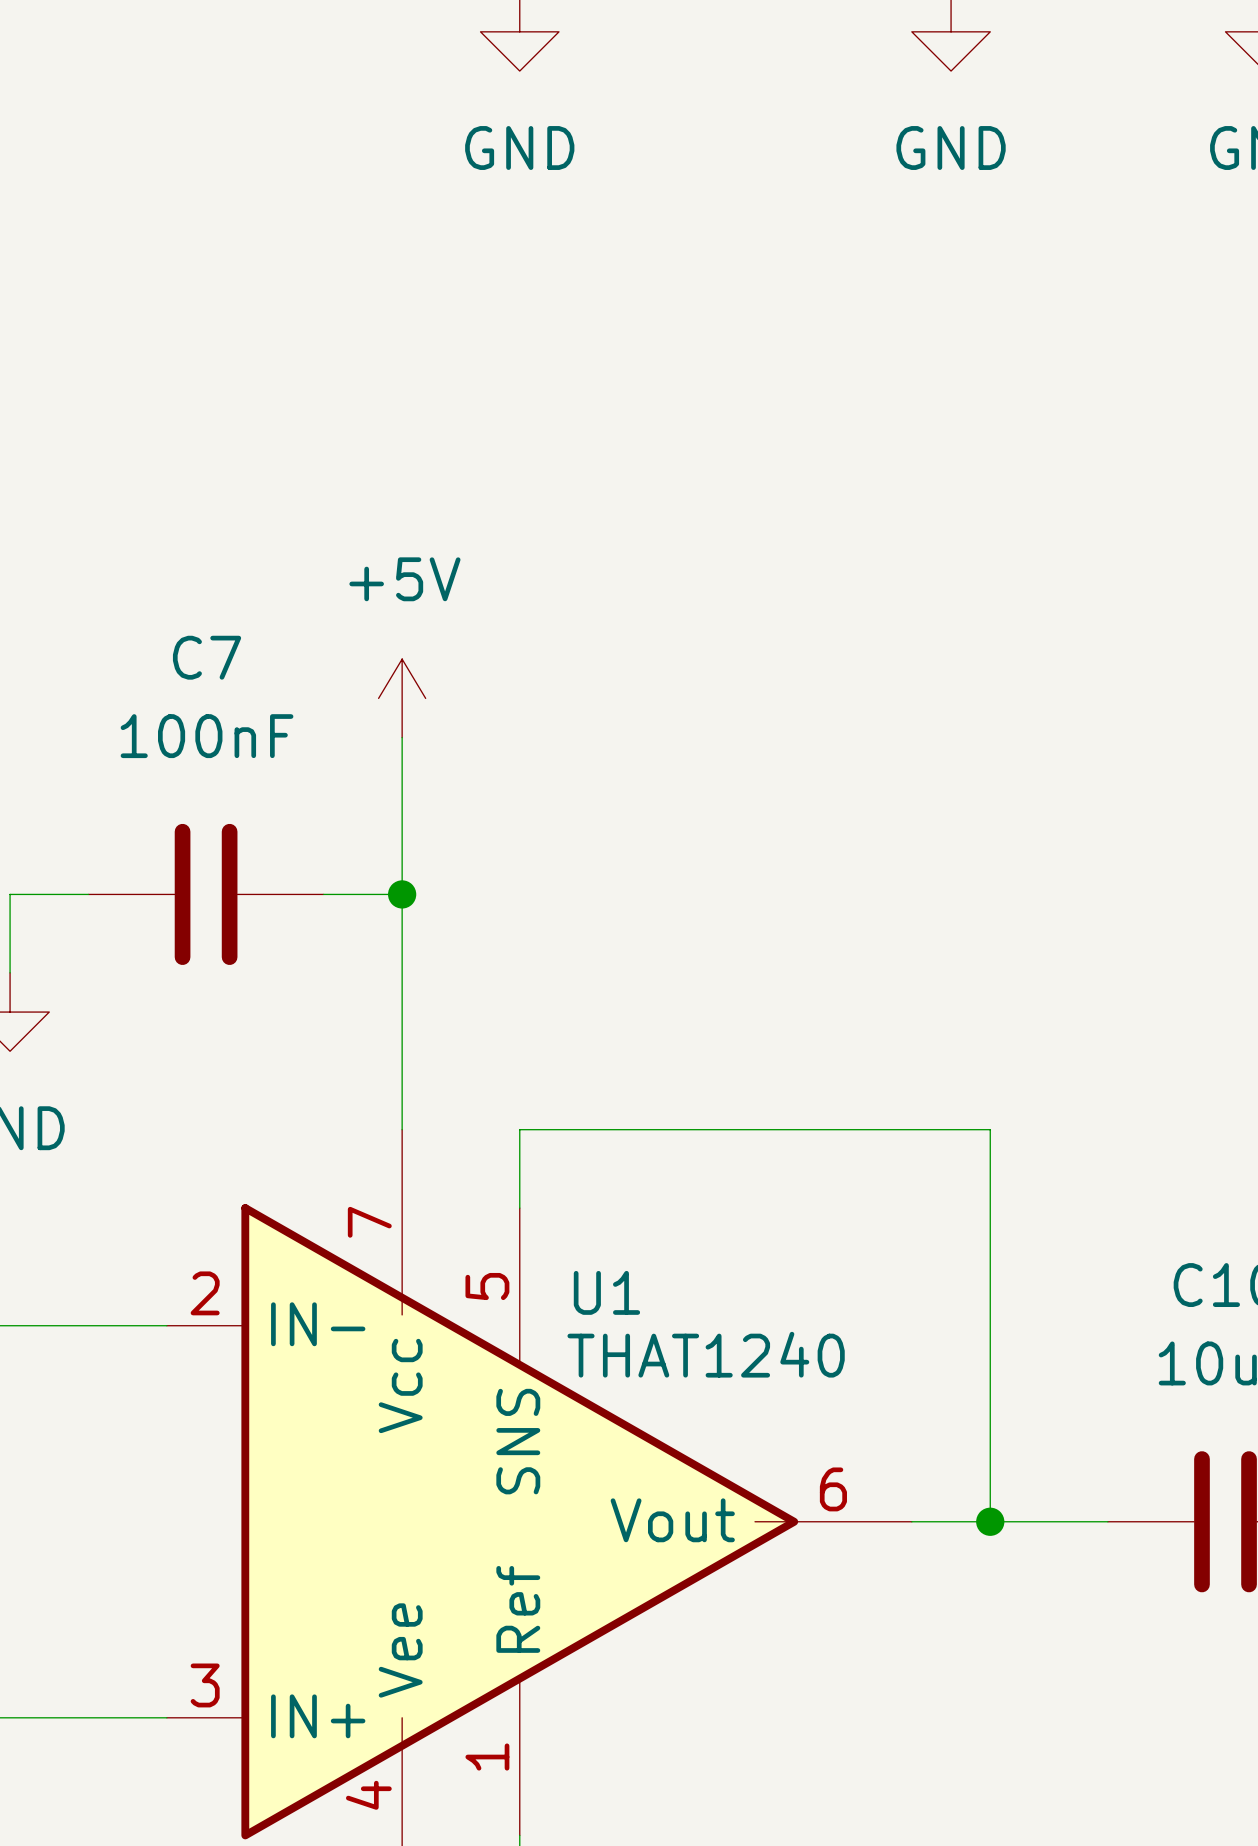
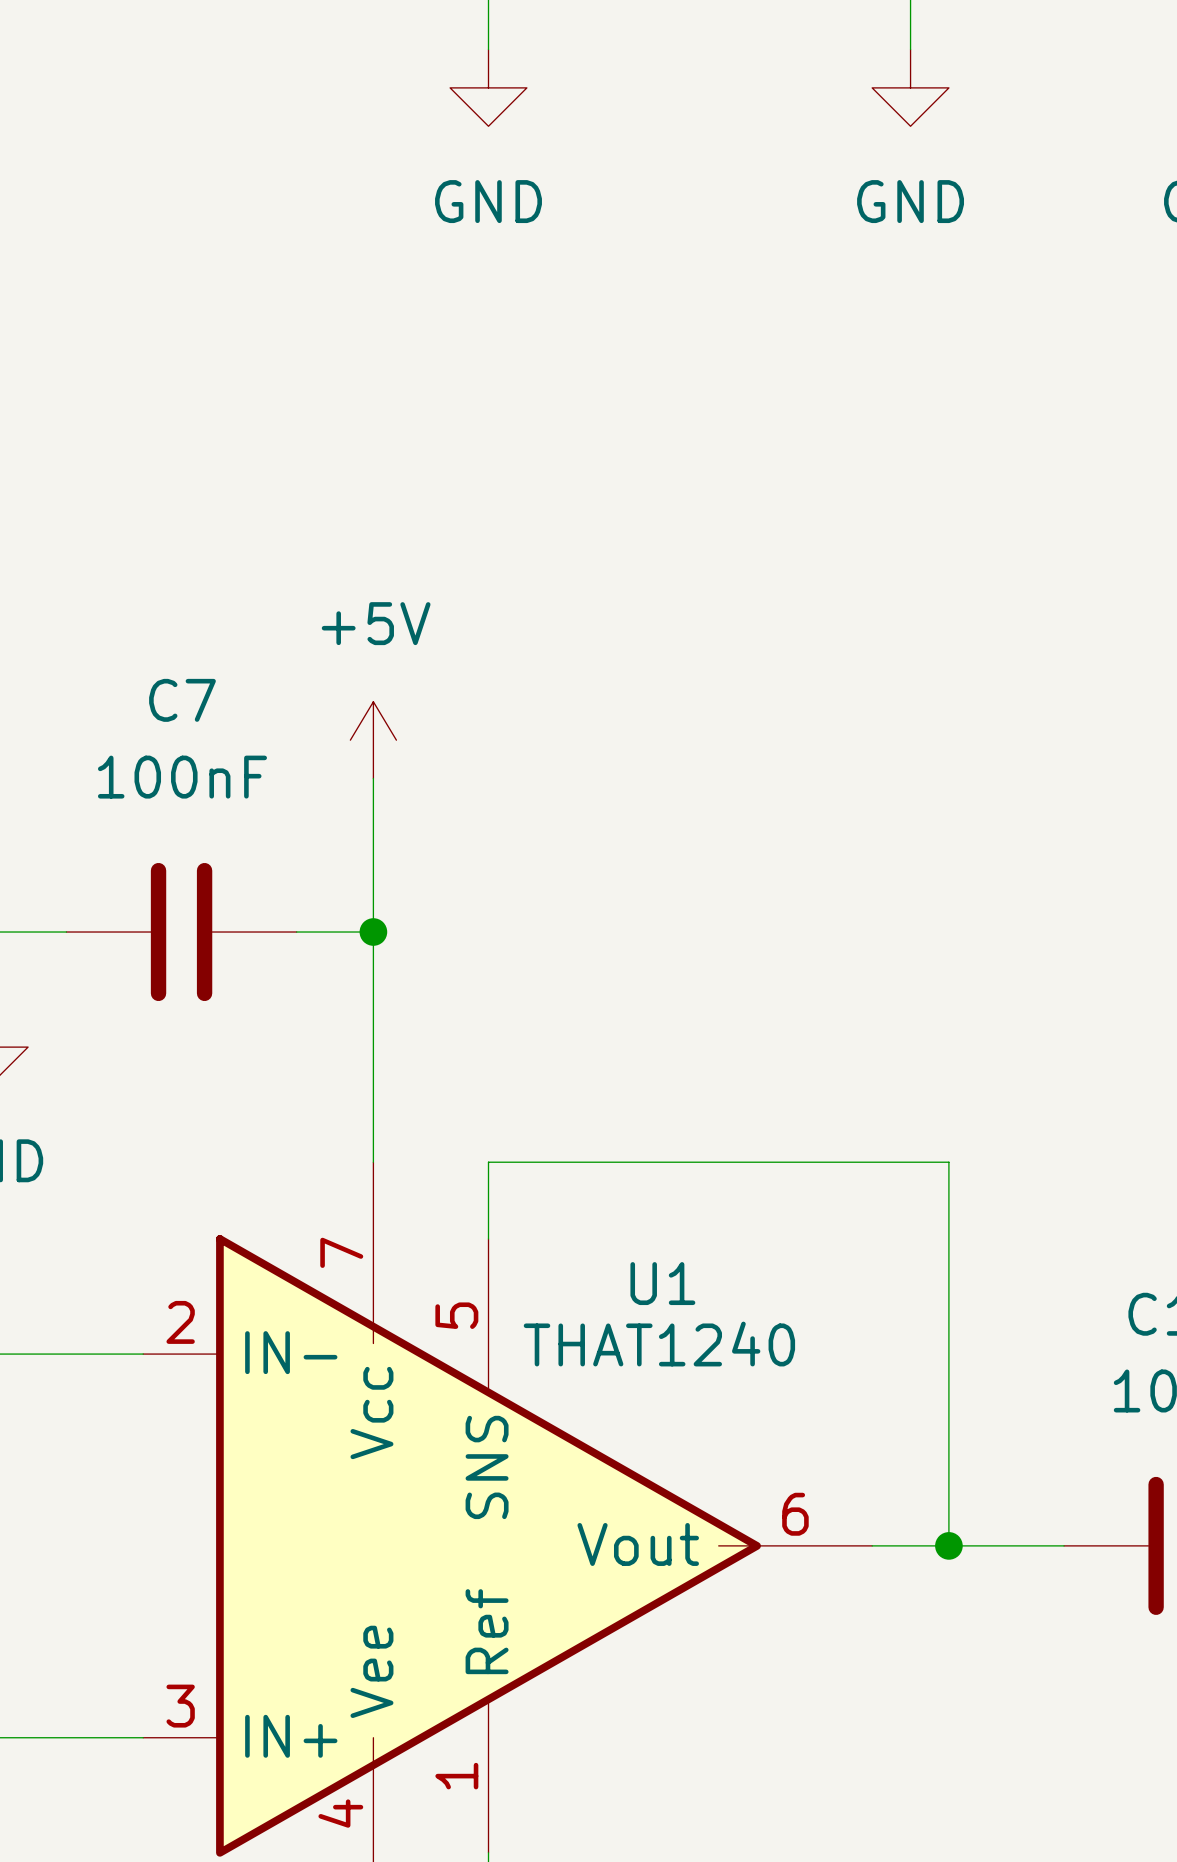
U1 name position: U1 (606, 1292) -> U1 (662, 1283)
U1 value position: THAT1240 (706, 1354) -> THAT1240 (659, 1344)

